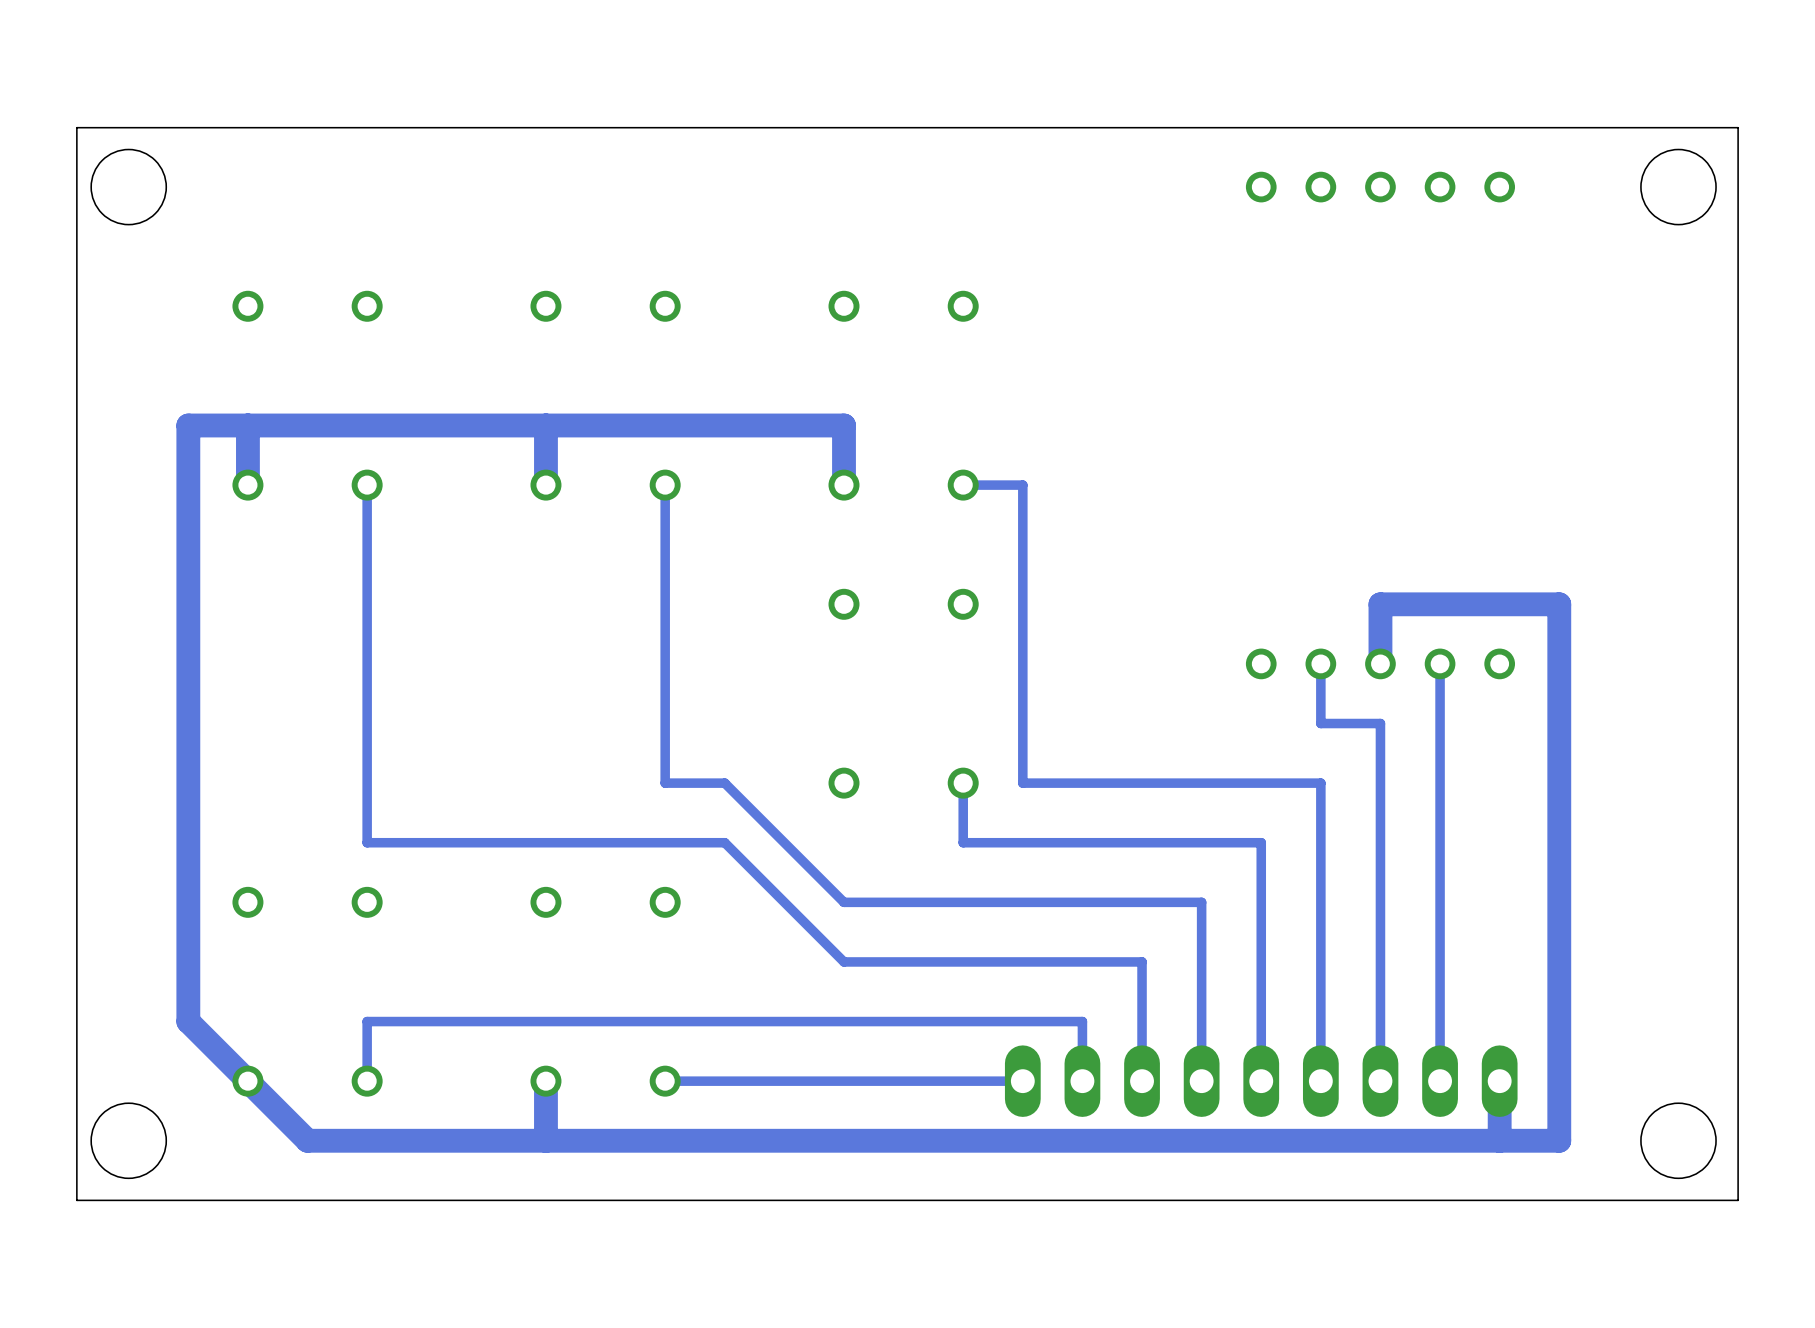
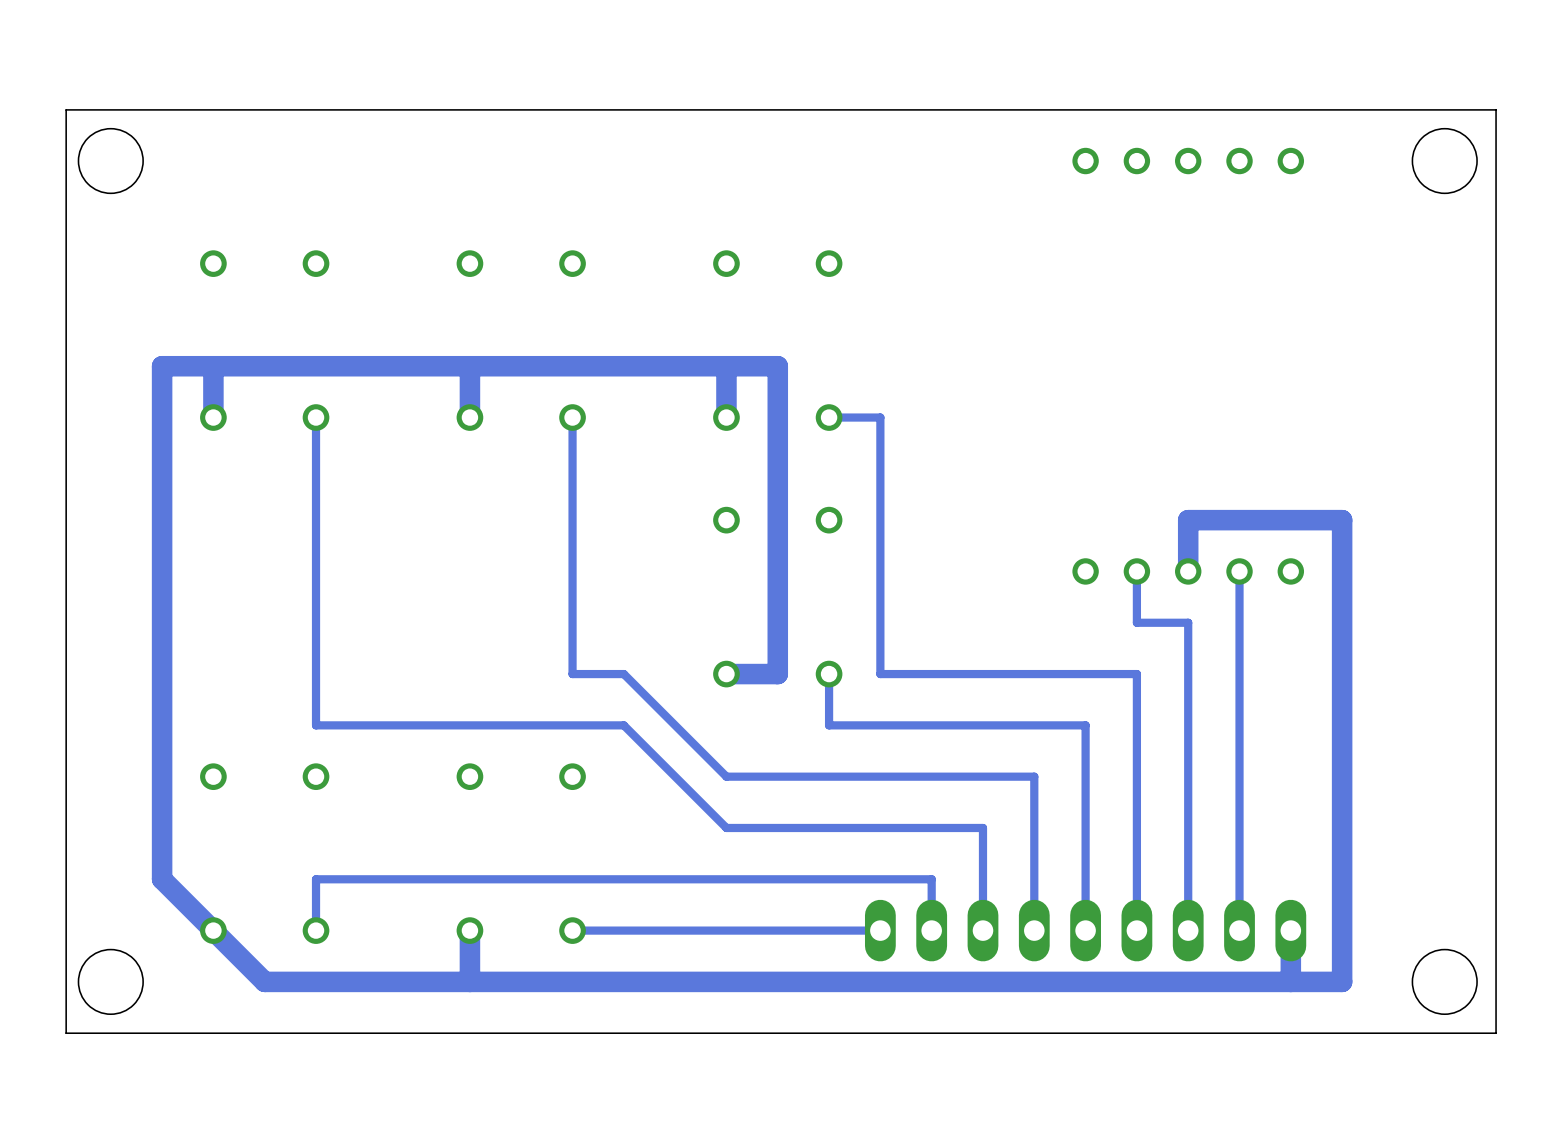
track: none -> (726, 366) (777, 366) (777, 674) (726, 674)

